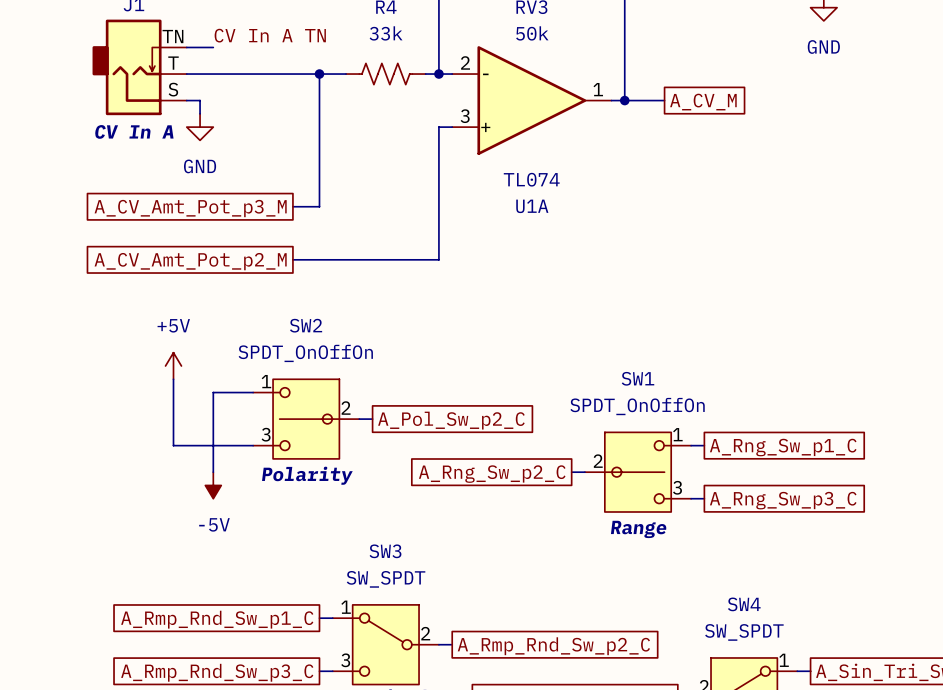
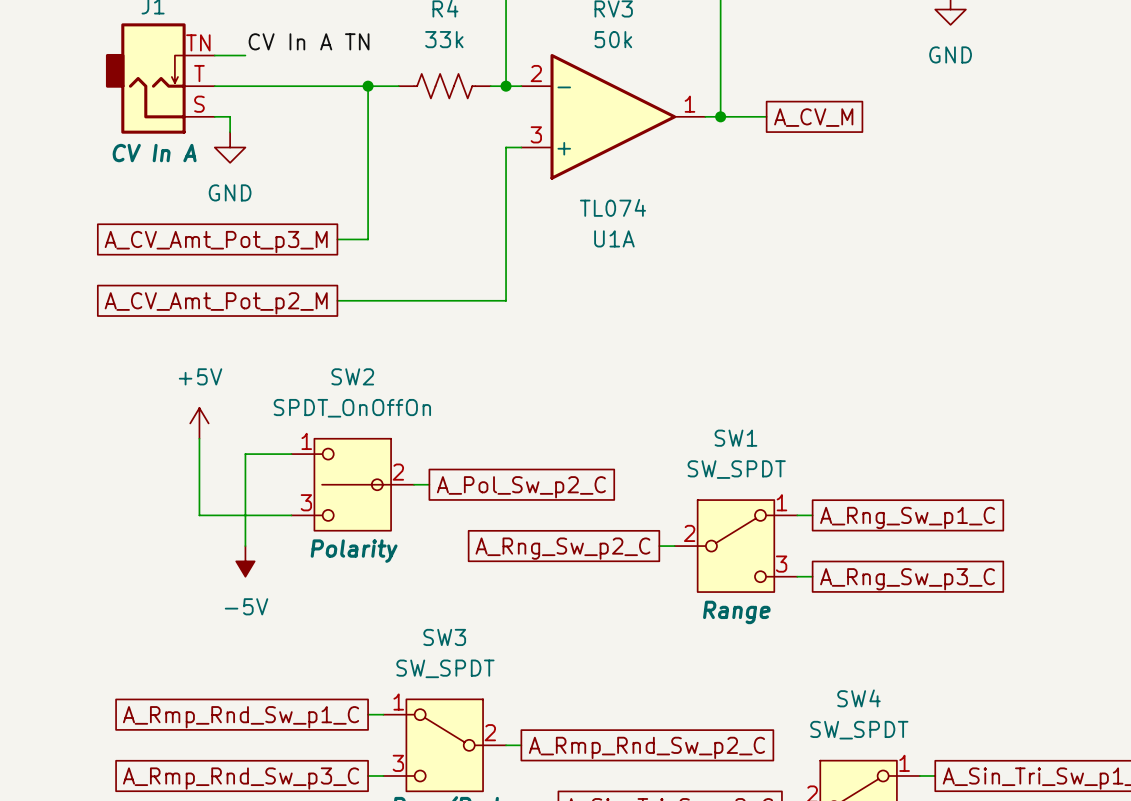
SW1 value: SPDT_OnOffOn (637, 406) -> SW_SPDT (736, 469)
SW1 symbol: [584, 432, 692, 512] -> [674, 500, 798, 593]

